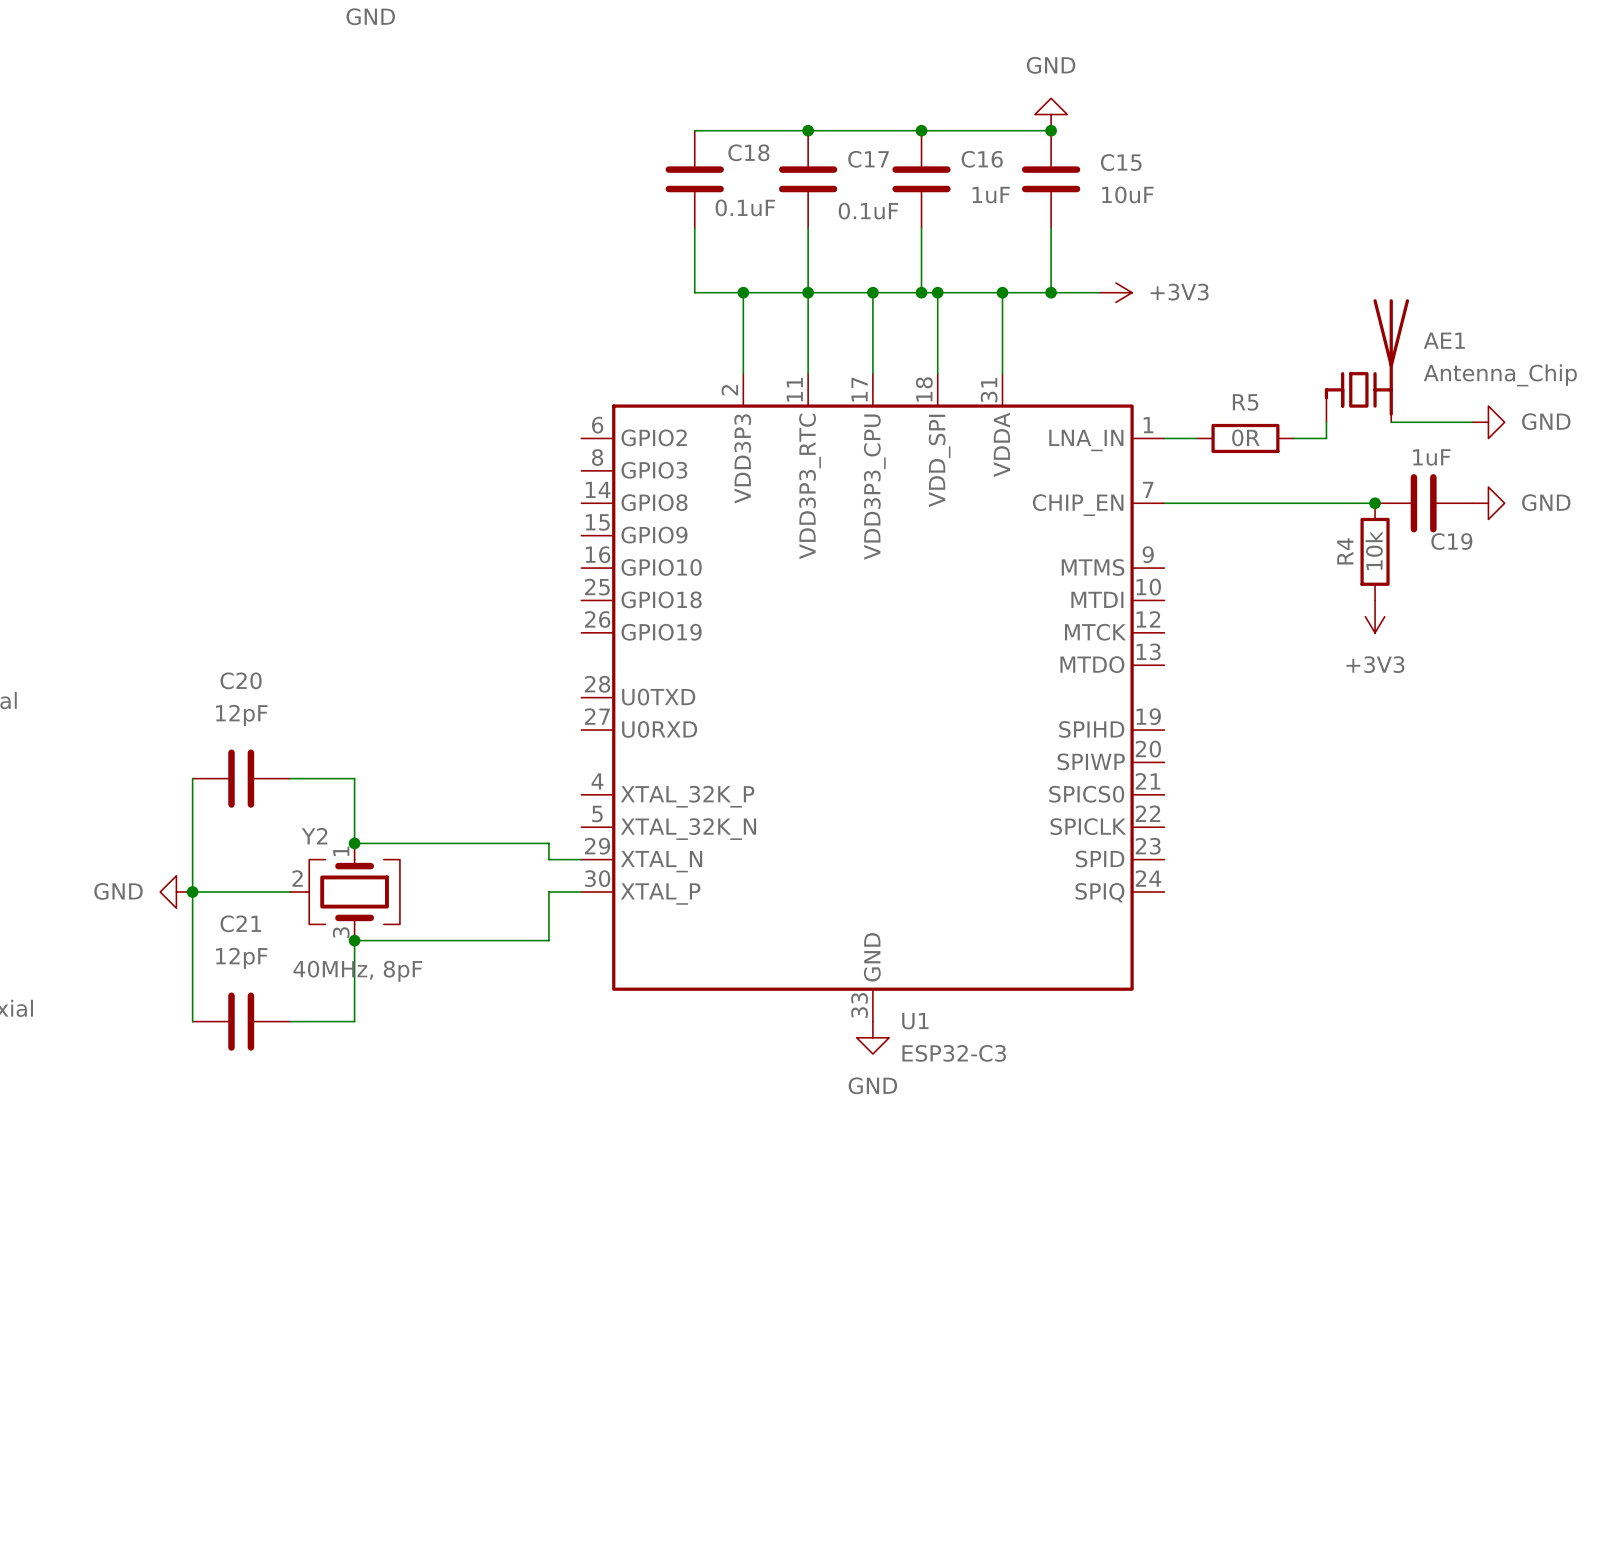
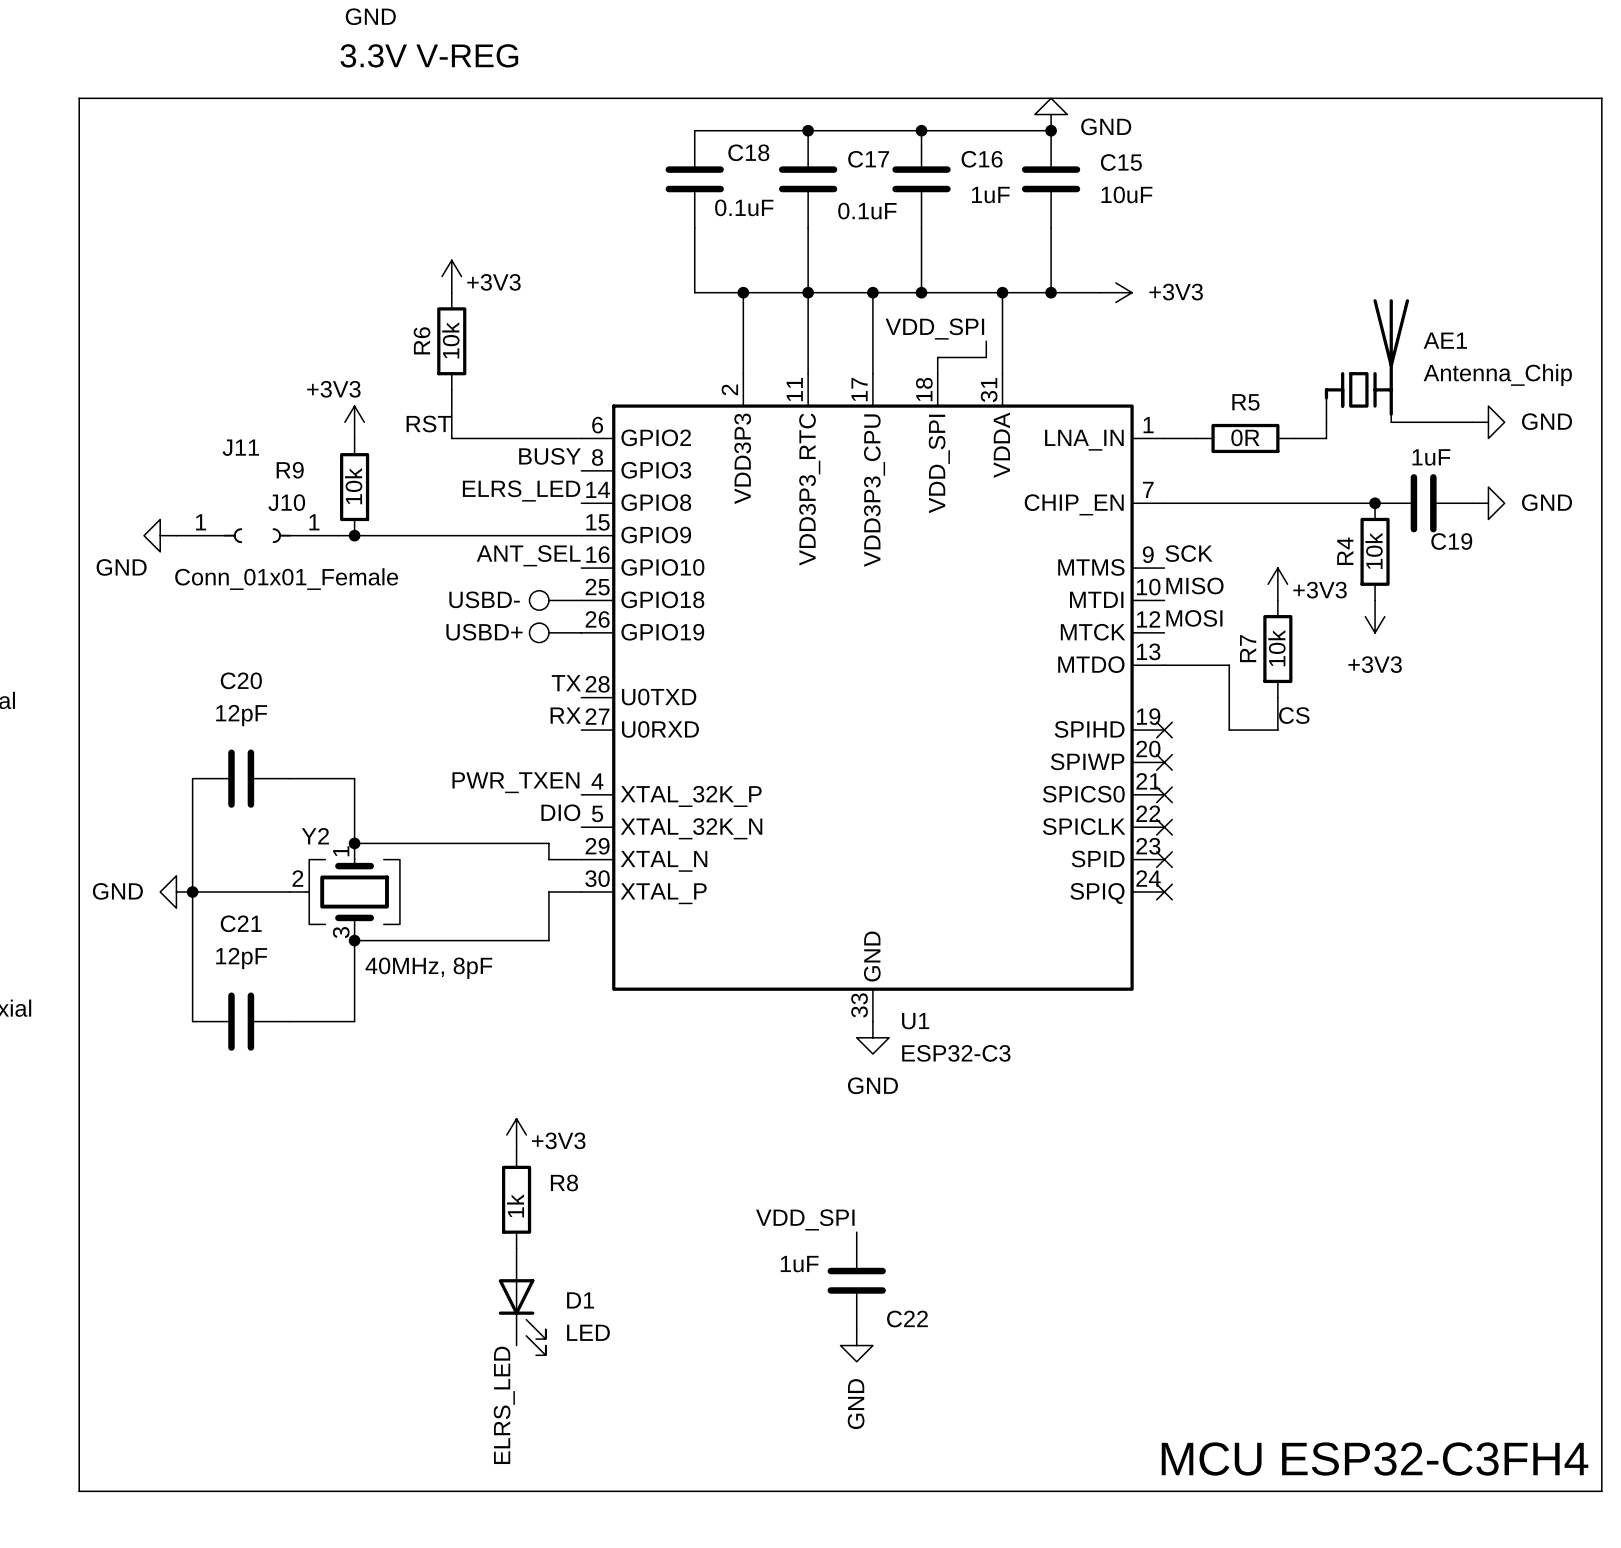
text: none -> 3.3V V-REG (429, 55)
power symbol text position: GND (1051, 65) -> GND (1106, 126)
line: none -> (79, 98) (1601, 98) (1601, 1491) (79, 1491) (79, 98)
power symbol: none -> +3V3 (451, 276)
wire: (937, 292) (937, 357) -> (986, 341) (986, 357) (937, 357)
junction: (937, 292) -> none
label: none -> VDD_SPI (934, 329)
R6: none -> 10k (451, 341)
wire: none -> (451, 389) (451, 438) (581, 438)
power symbol: none -> +3V3 (354, 422)
label: none -> RST (428, 424)
label: none -> BUSY (550, 456)
R9: none -> 10k (354, 487)
label: none -> ELRS_LED (521, 491)
power symbol: none -> GND (160, 535)
J11: none -> Conn_01x01_Female (209, 535)
J10: none -> (305, 535)
wire: none -> (338, 535) (581, 535)
junction: none -> (354, 535)
label: none -> SCK (1189, 553)
label: none -> ANT_SEL (528, 555)
power symbol: none -> +3V3 (1277, 584)
label: none -> MISO (1194, 585)
part: none -> USBD- (555, 600)
label: none -> MOSI (1194, 618)
part: none -> USBD+ (555, 632)
R7: none -> 10k (1277, 649)
wire: none -> (1164, 665) (1229, 665) (1229, 730) (1277, 730) (1277, 697)
label: none -> TX (566, 683)
label: none -> RX (565, 715)
label: none -> CS (1294, 715)
no-connect mark: none -> (1164, 730)
no-connect mark: none -> (1164, 762)
label: none -> PWR_TXEN (515, 782)
no-connect mark: none -> (1164, 794)
label: none -> DIO (560, 812)
no-connect mark: none -> (1164, 827)
no-connect mark: none -> (1164, 859)
no-connect mark: none -> (1164, 892)
Y2 value position: 40MHz, 8pF (357, 971) -> 40MHz, 8pF (428, 968)
power symbol: none -> +3V3 (516, 1134)
R8: none -> 1k (516, 1199)
label: none -> VDD_SPI (805, 1219)
C22: none -> 1uF (856, 1280)
D1: none -> LED (522, 1301)
power symbol: none -> GND (856, 1345)
label: none -> ELRS_LED (504, 1405)
text: none -> MCU ESP32-C3FH4 (1375, 1459)

